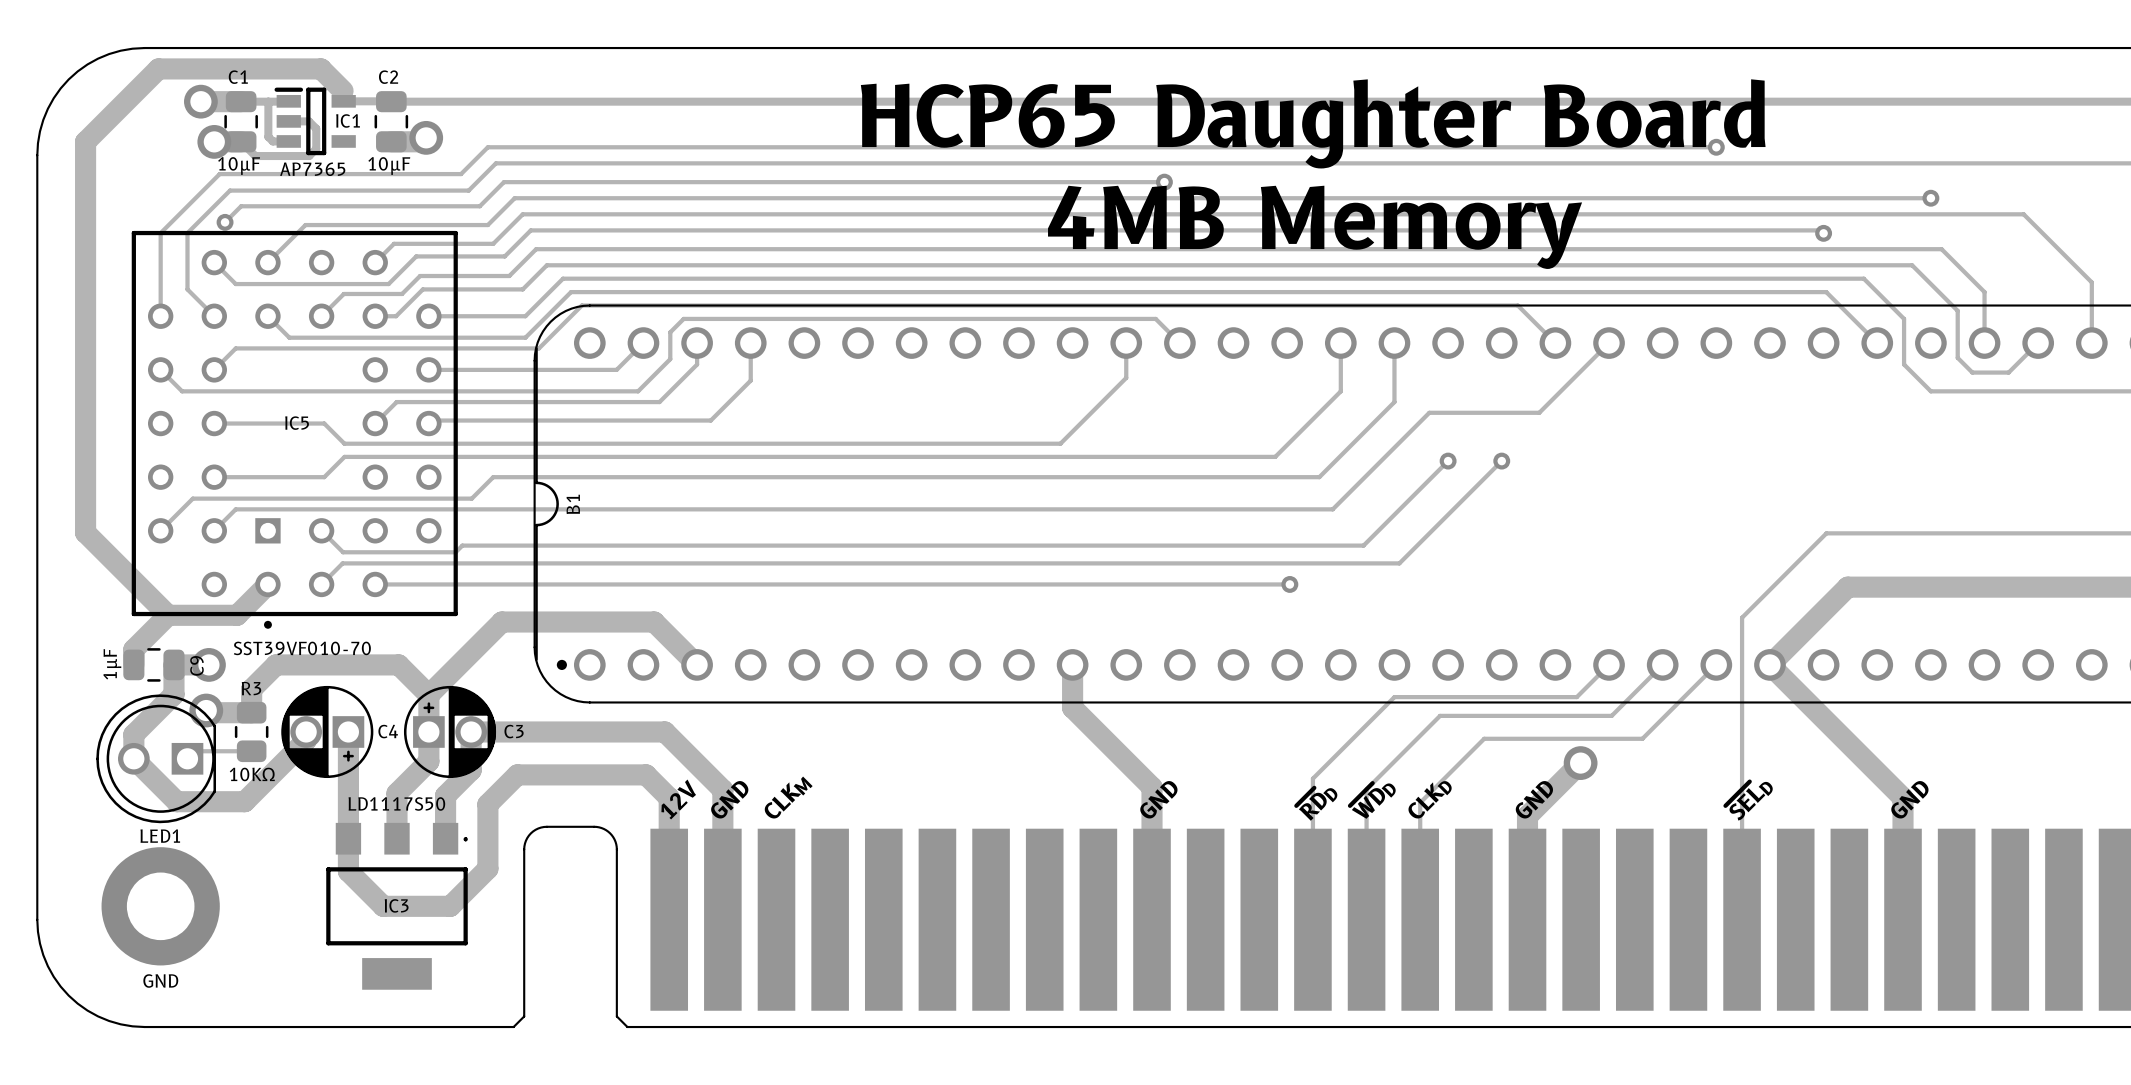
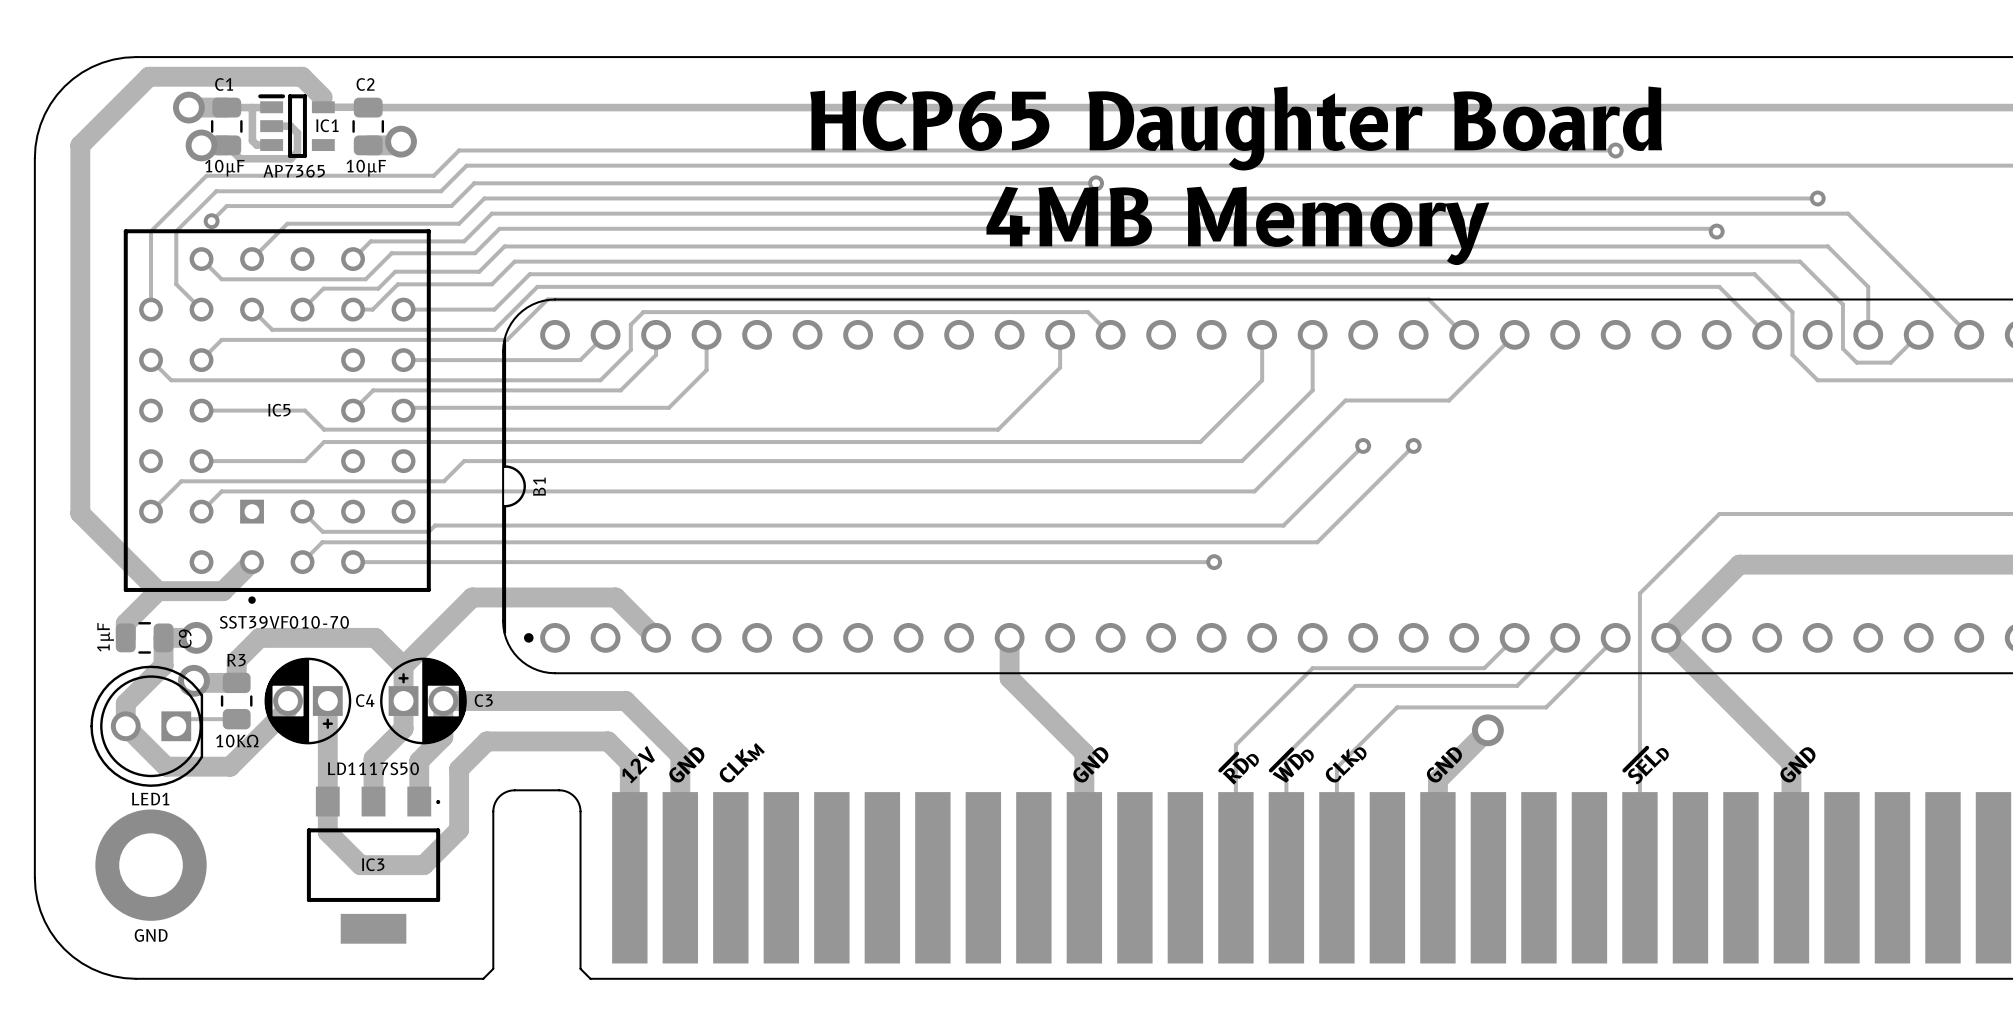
track: (1963, 214) (2023, 214) (2091, 282) (2091, 343) -> (1848, 213) (1969, 334)

